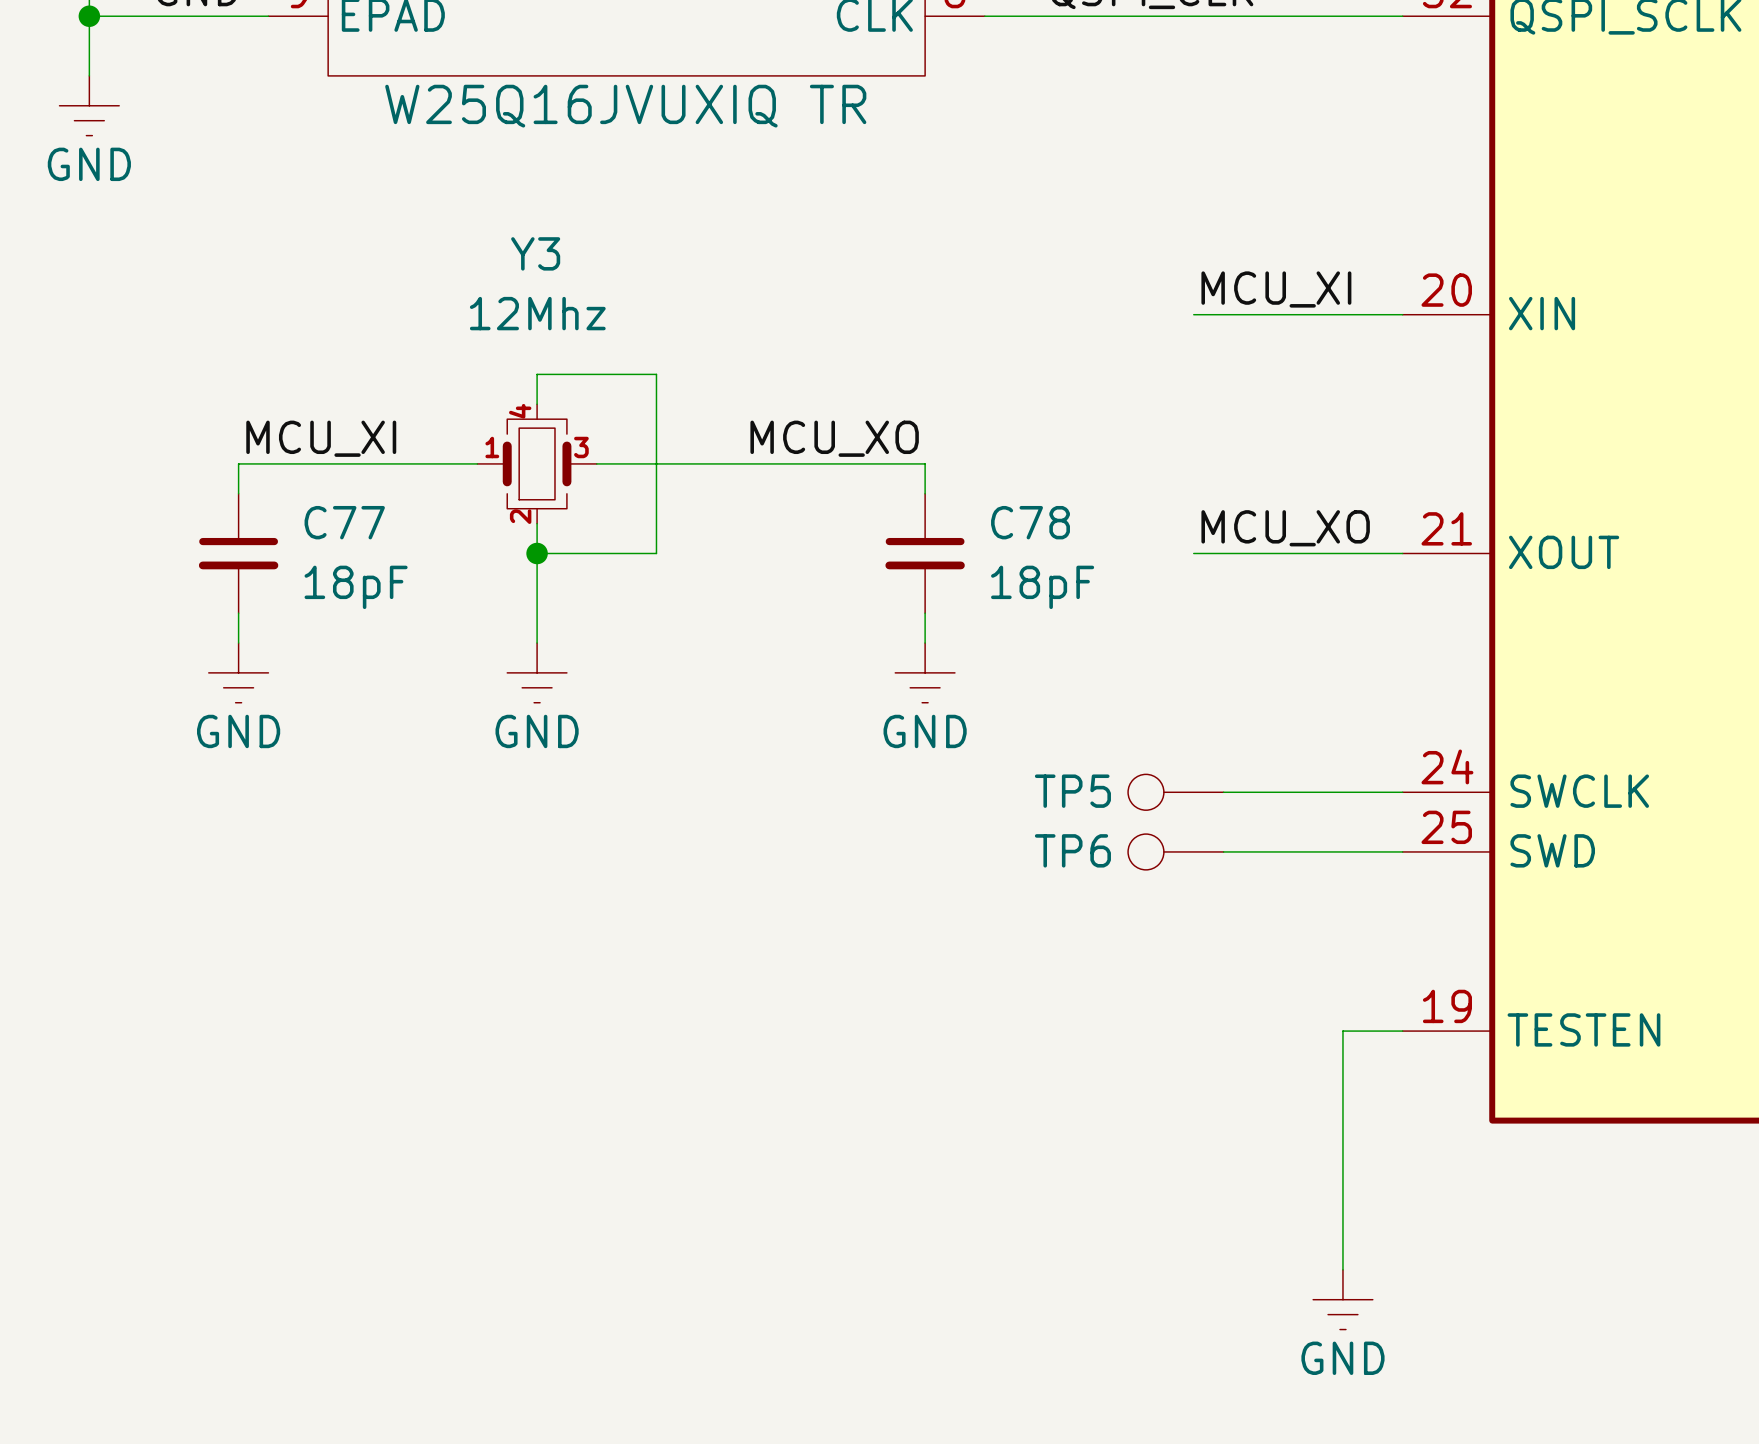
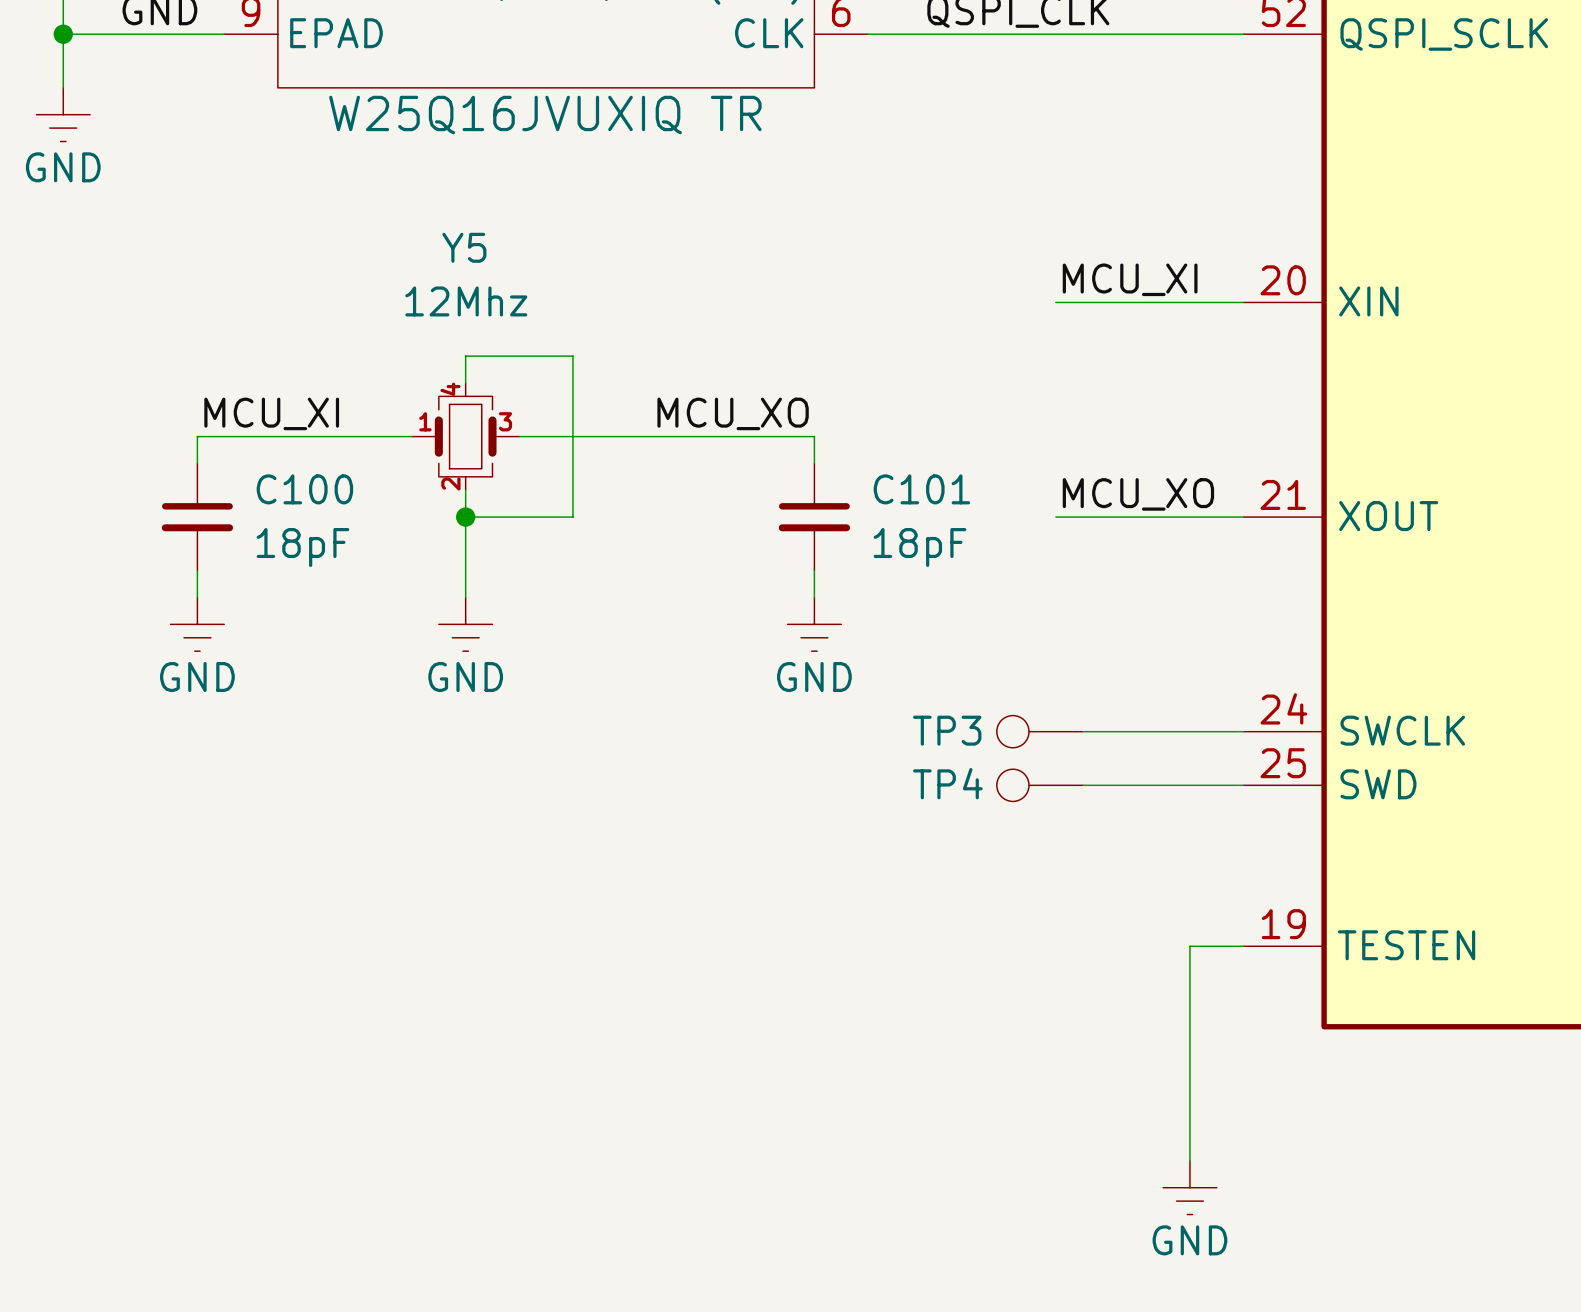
Y3 name: Y3 (535, 253) -> Y5 (464, 247)
C77 name: C77 (344, 522) -> C100 (304, 489)
C78 name: C78 (1030, 522) -> C101 (921, 489)
TP5 name: TP5 (1072, 791) -> TP3 (947, 730)
TP6 name: TP6 (1072, 850) -> TP4 (947, 783)

